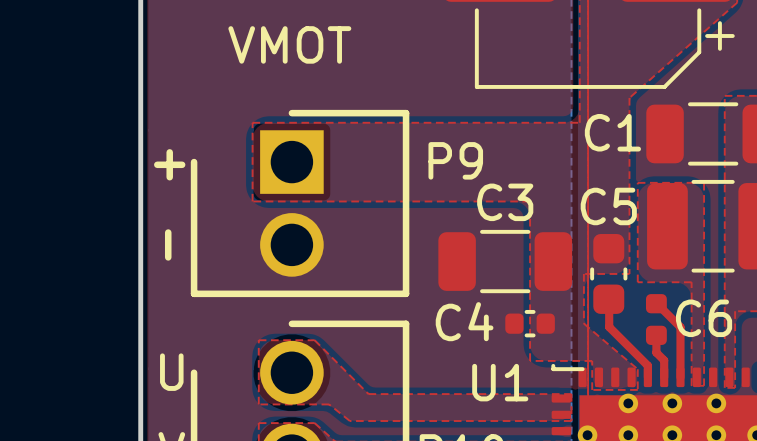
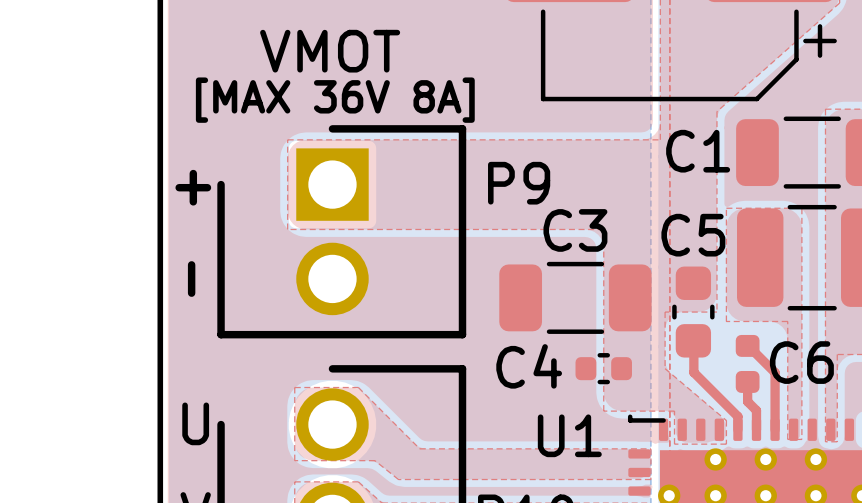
text: none -> [MAX 36V 8A] (335, 100)

